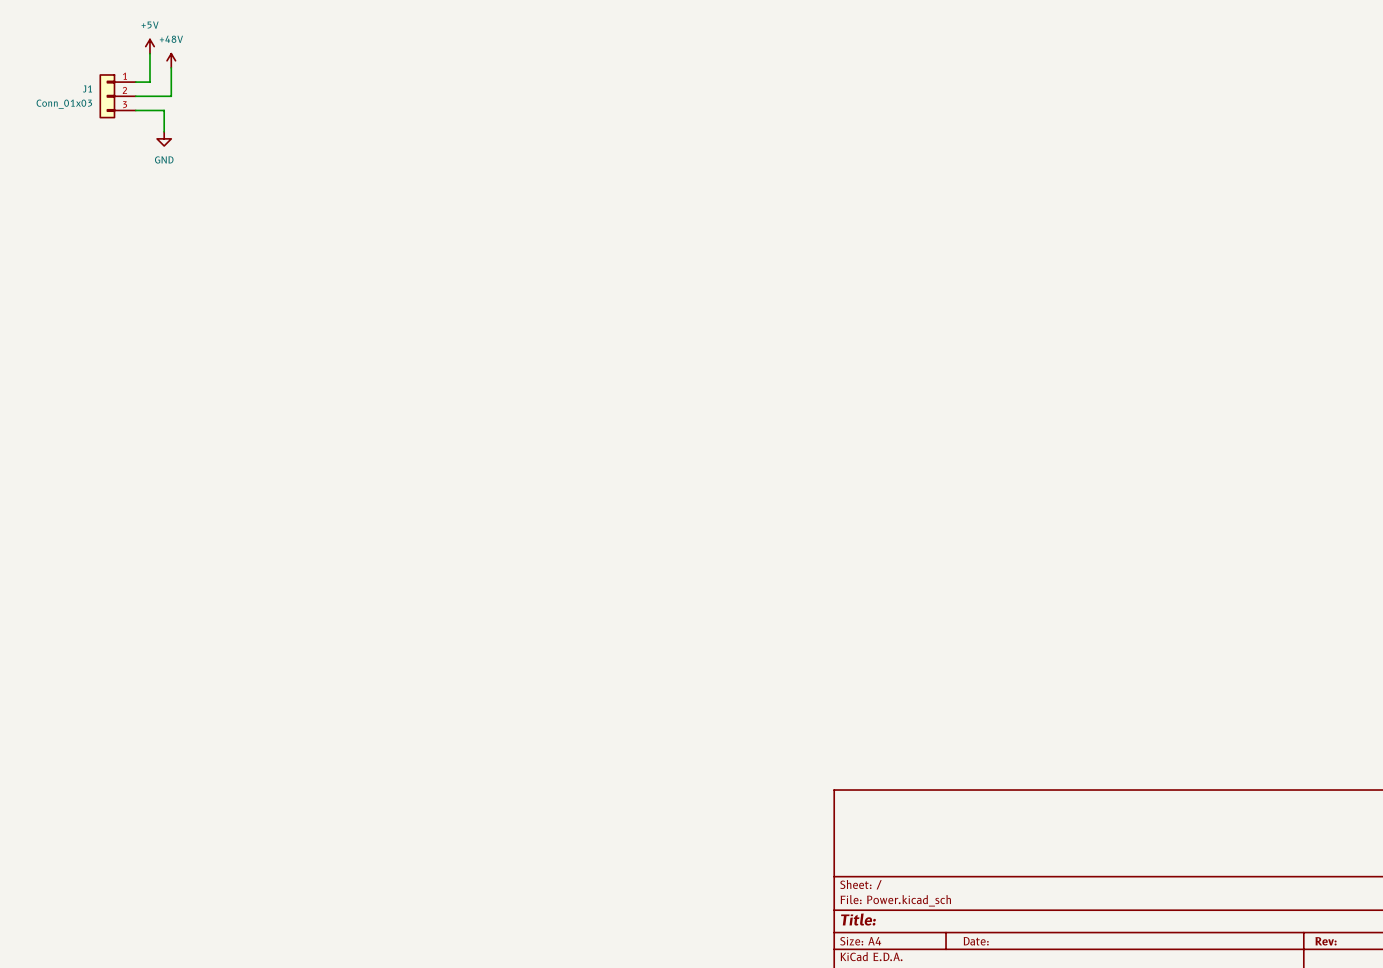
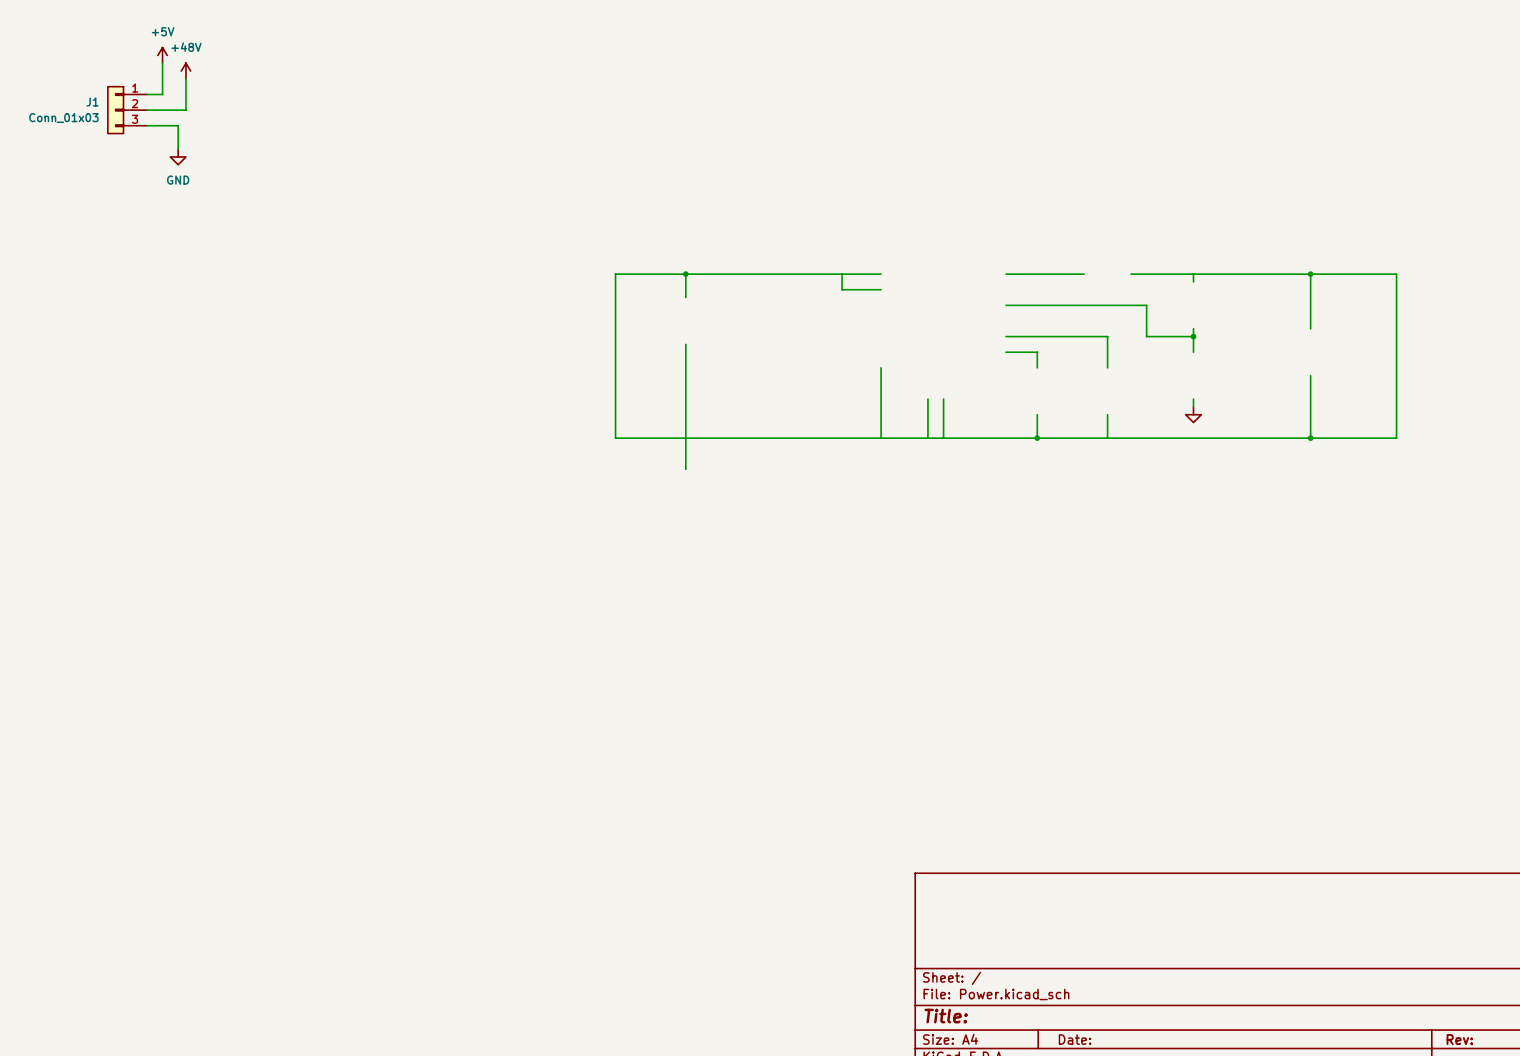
wire: none -> (685, 274) (685, 297)
junction: none -> (685, 274)
wire: none -> (842, 274) (842, 289) (881, 289)
wire: none -> (881, 274) (615, 274) (615, 438) (1396, 438) (1396, 274) (1131, 274)
wire: none -> (1006, 274) (1084, 274)
wire: none -> (1193, 274) (1193, 281)
wire: none -> (1310, 274) (1310, 328)
junction: none -> (1310, 274)
wire: none -> (1006, 305) (1146, 305) (1146, 336) (1193, 336)
wire: none -> (1193, 328) (1193, 352)
wire: none -> (1006, 336) (1107, 336) (1107, 367)
junction: none -> (1193, 336)
wire: none -> (685, 344) (685, 469)
wire: none -> (1006, 352) (1037, 352) (1037, 367)
wire: none -> (881, 367) (881, 438)
wire: none -> (1310, 375) (1310, 438)
wire: none -> (927, 399) (927, 438)
wire: none -> (943, 399) (943, 438)
wire: none -> (1193, 399) (1193, 406)
wire: none -> (1037, 414) (1037, 438)
wire: none -> (1107, 414) (1107, 438)
power symbol: none -> (1193, 414)
junction: none -> (1037, 438)
junction: none -> (1310, 438)

